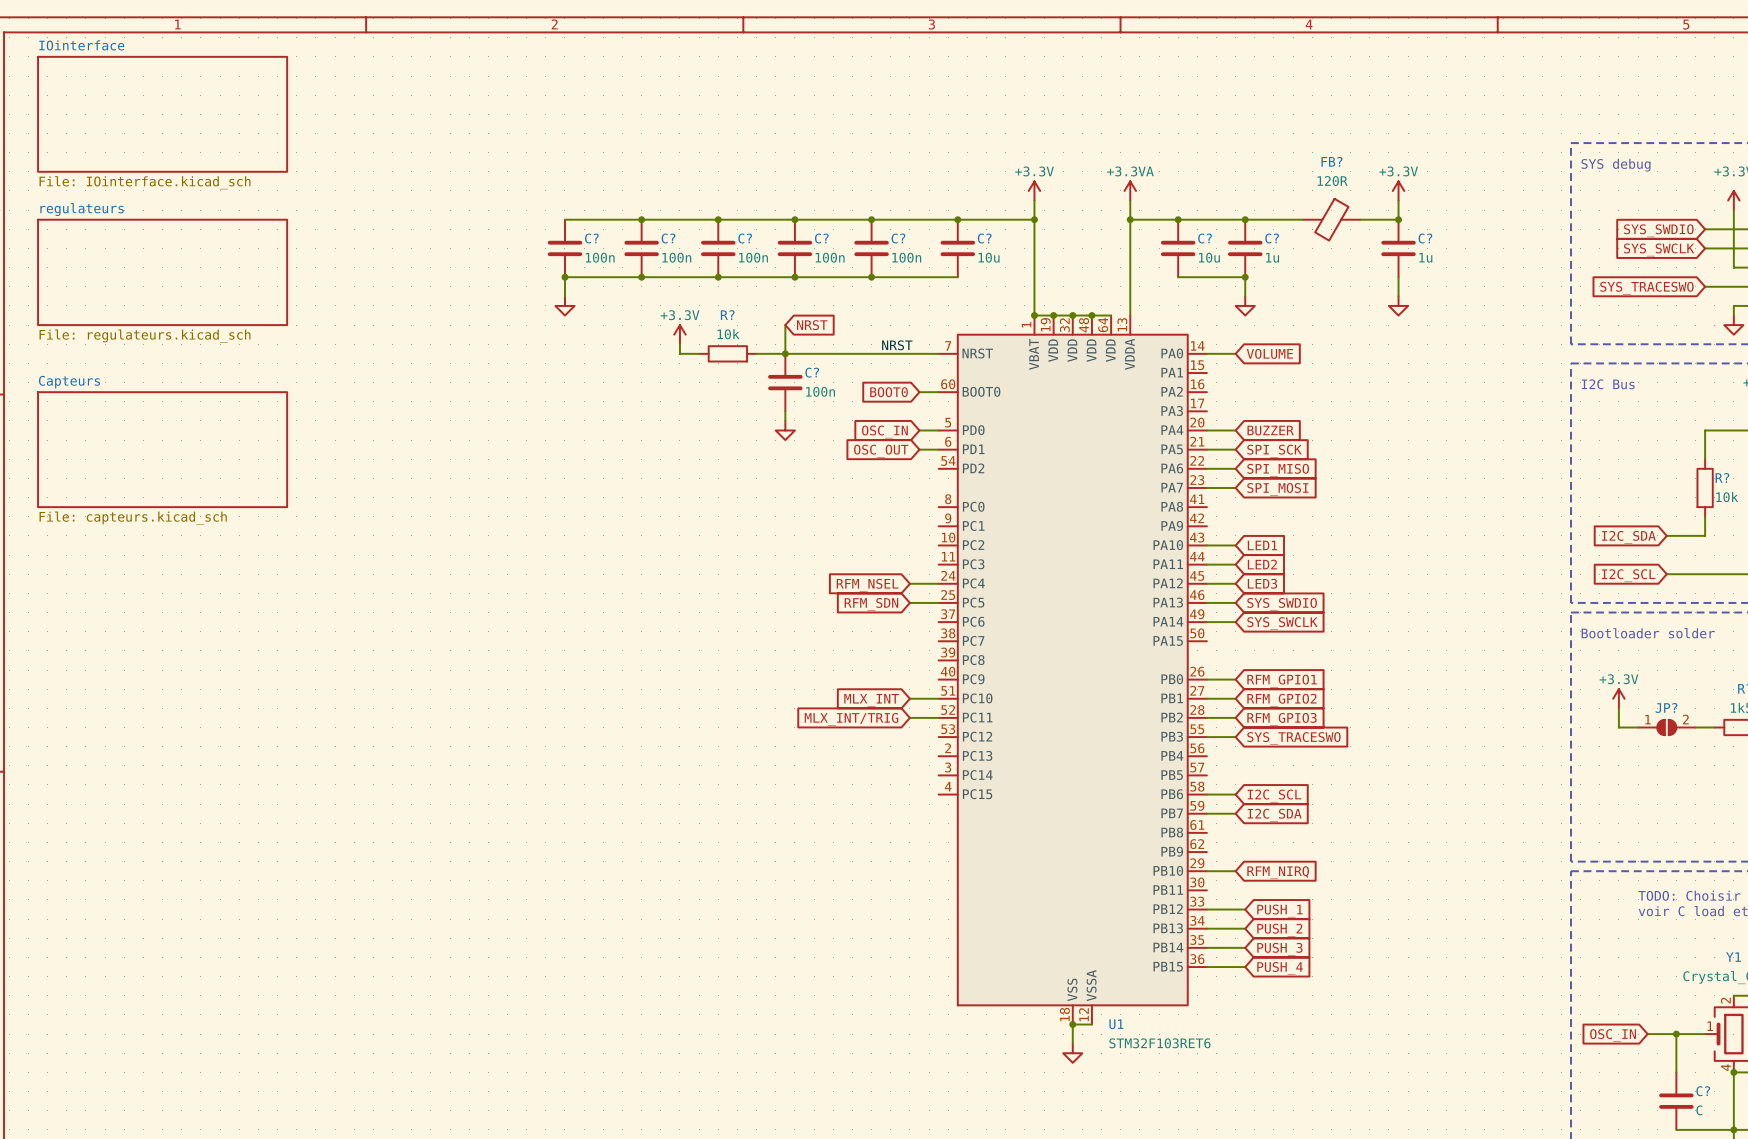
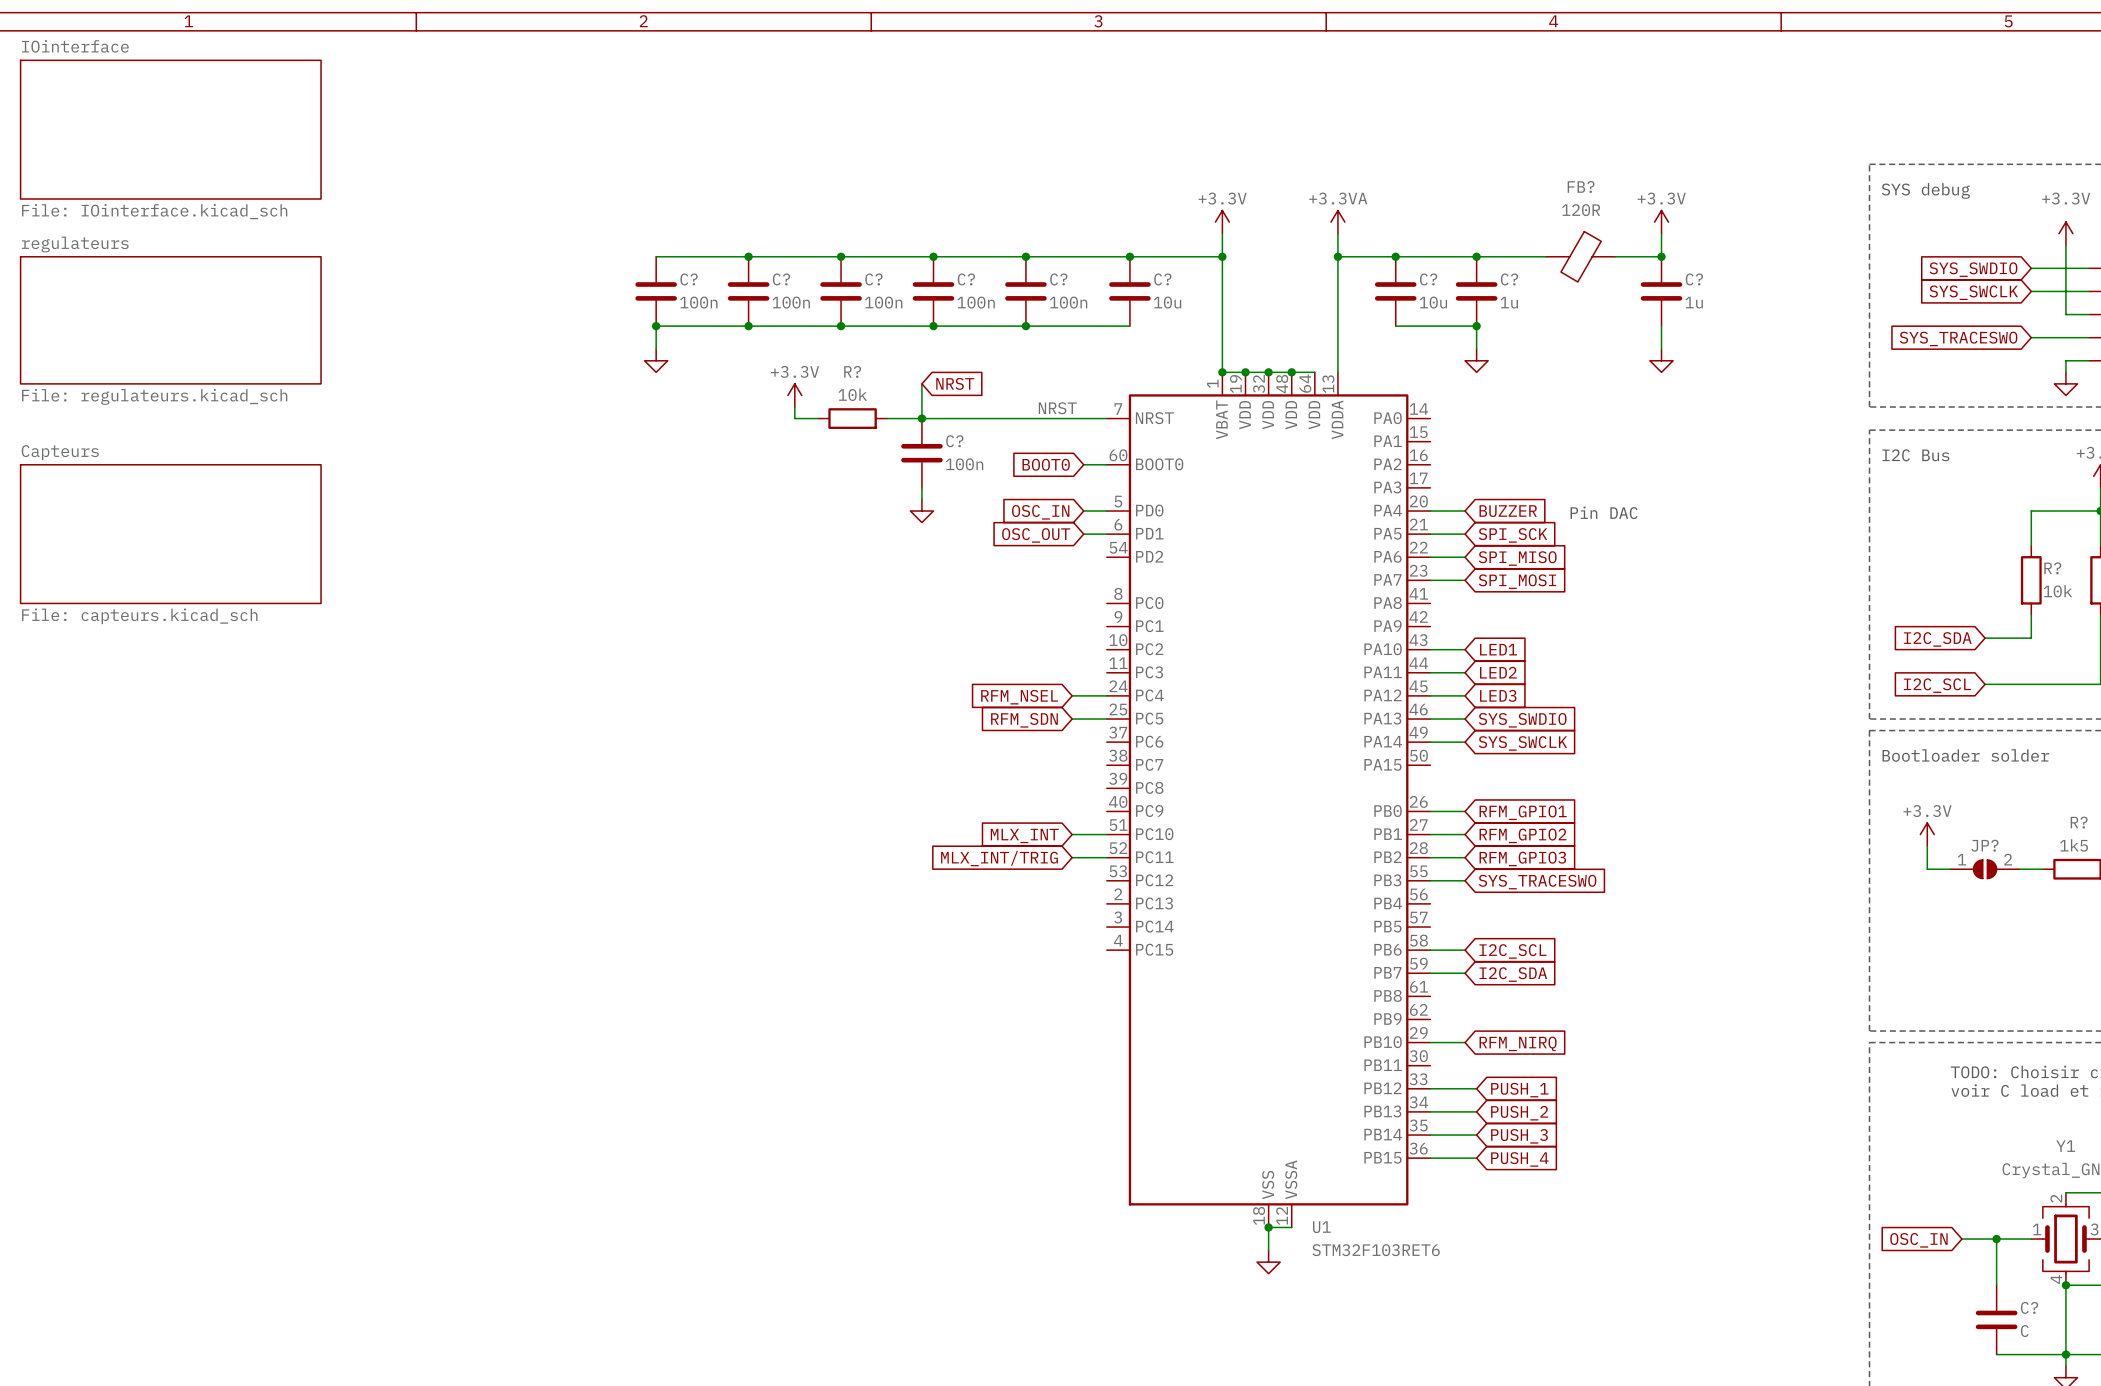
wire: (1206, 353) (1235, 353) -> none
global label: VOLUME (1269, 353) -> none
text: none -> Pin DAC (1604, 512)

